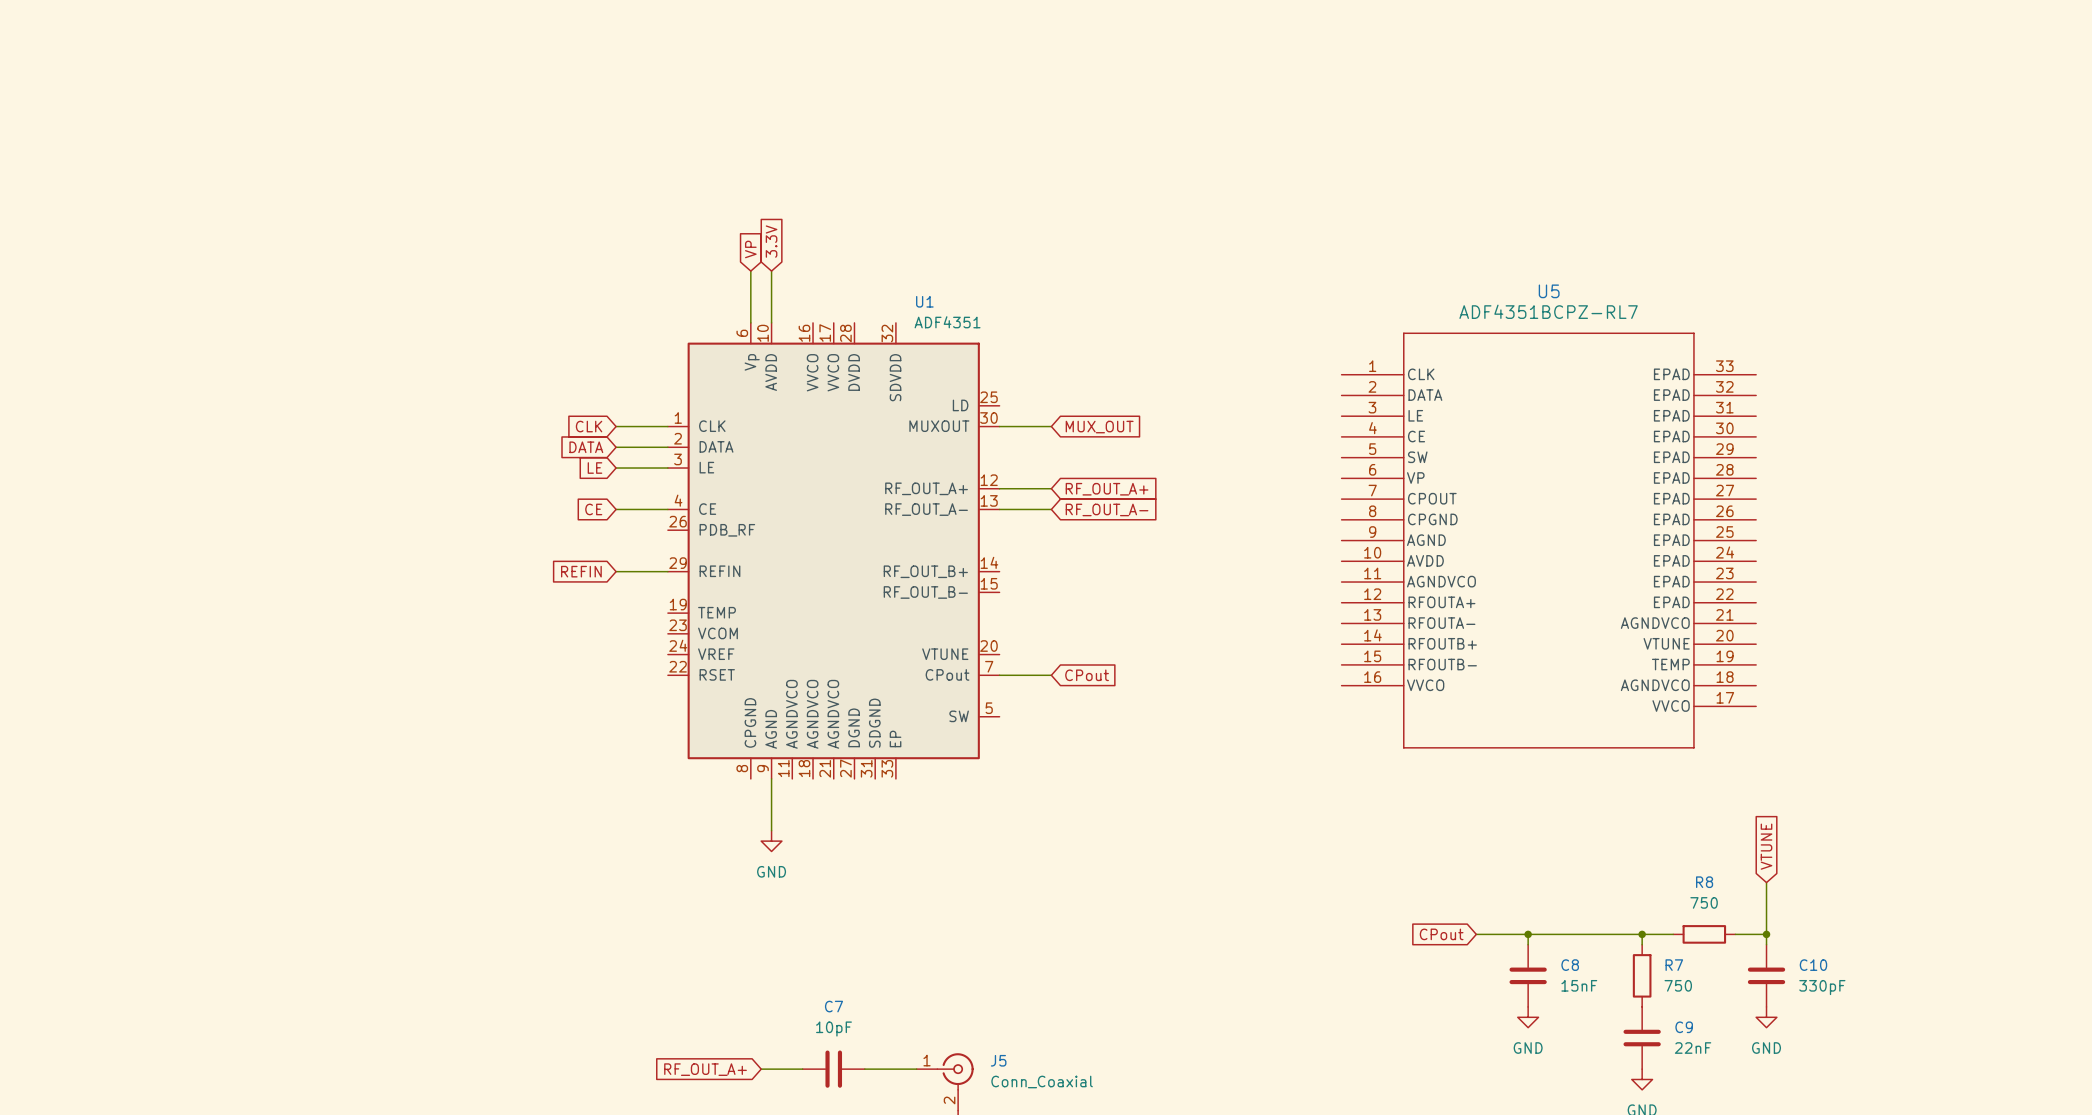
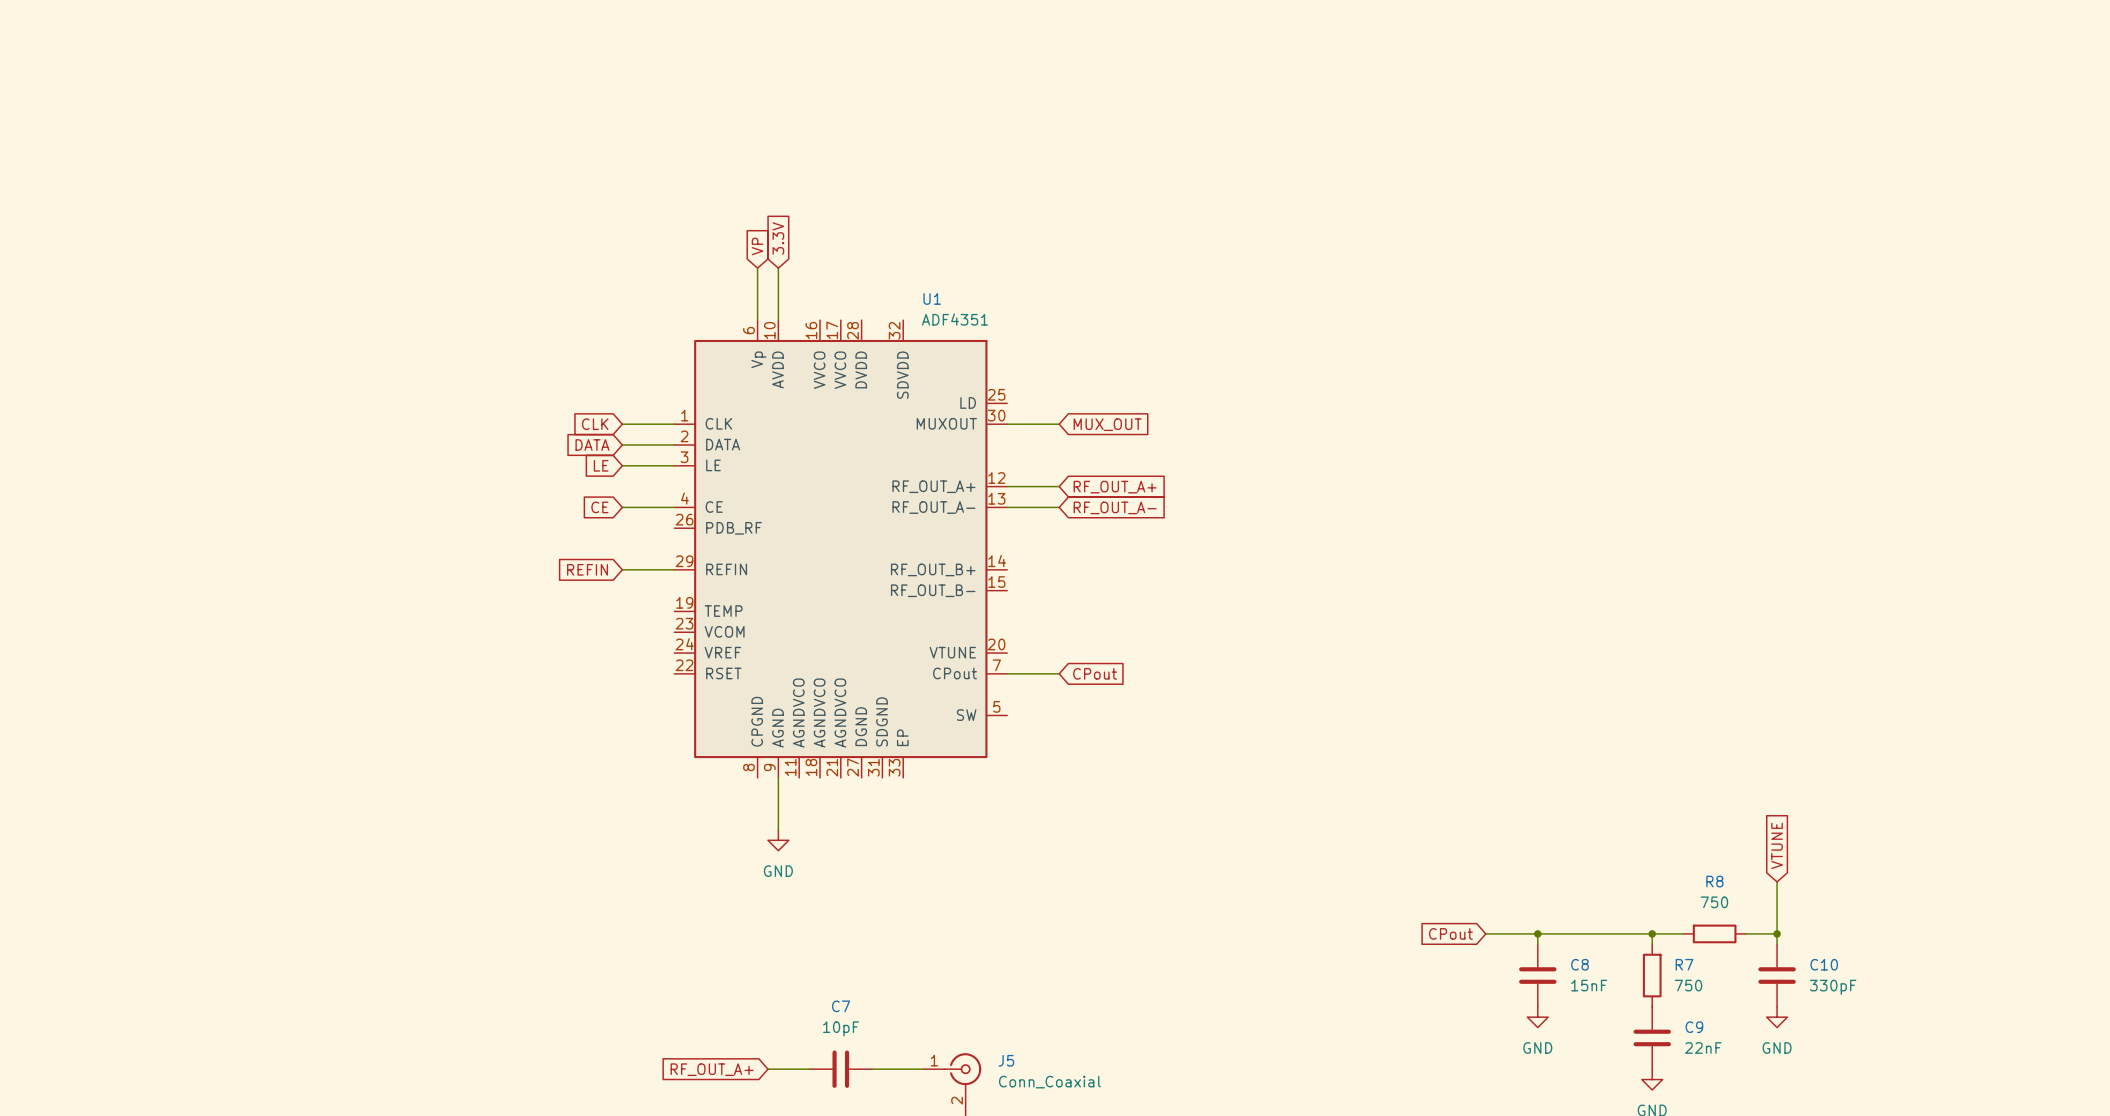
U5: ADF4351BCPZ-RL7 (1548, 540) -> none

